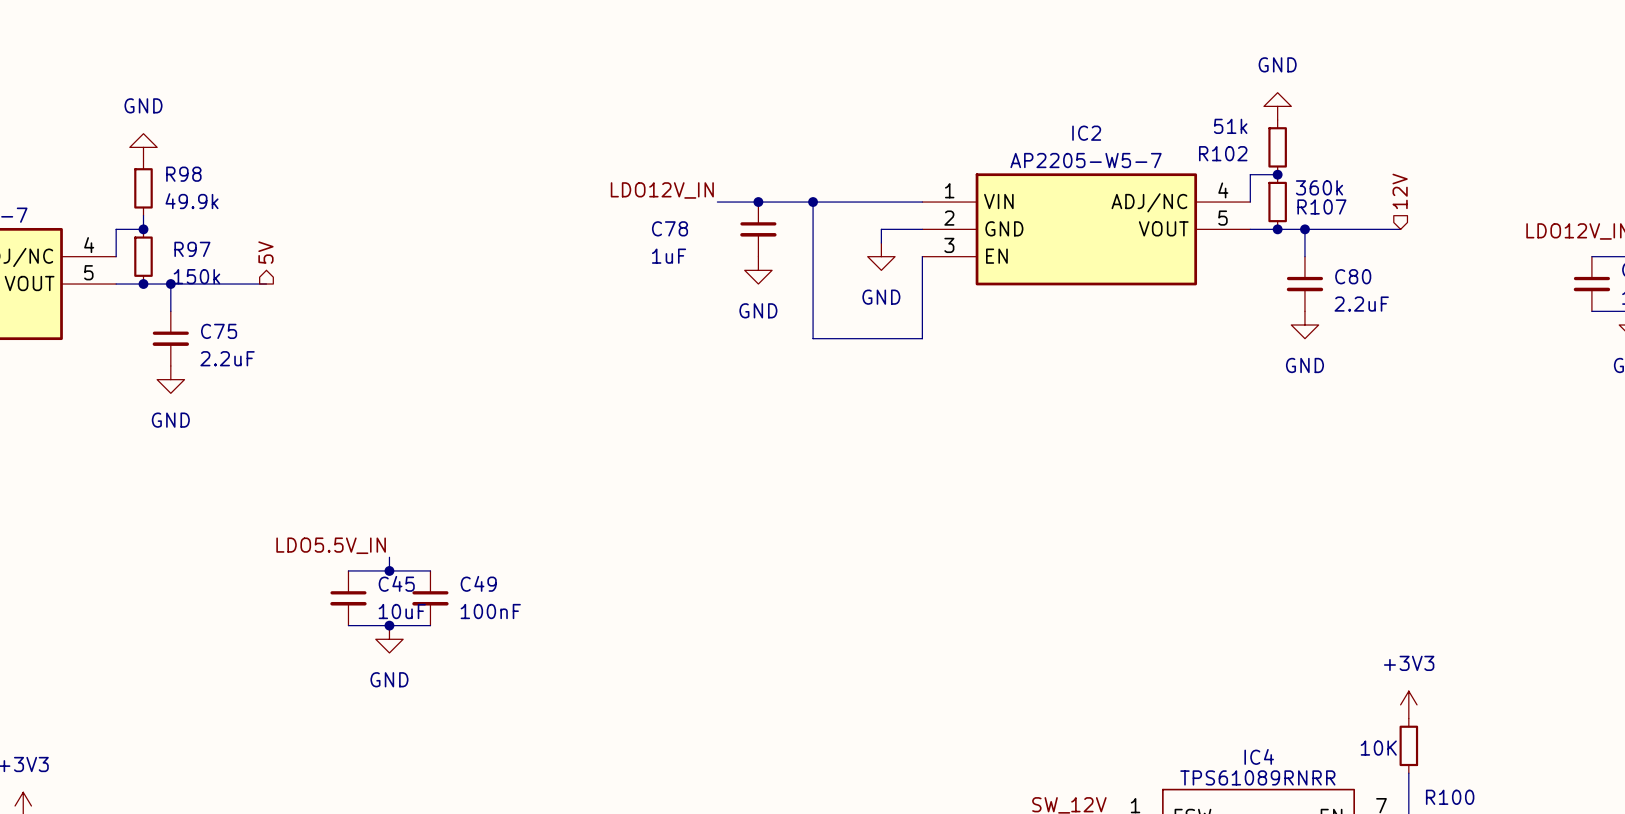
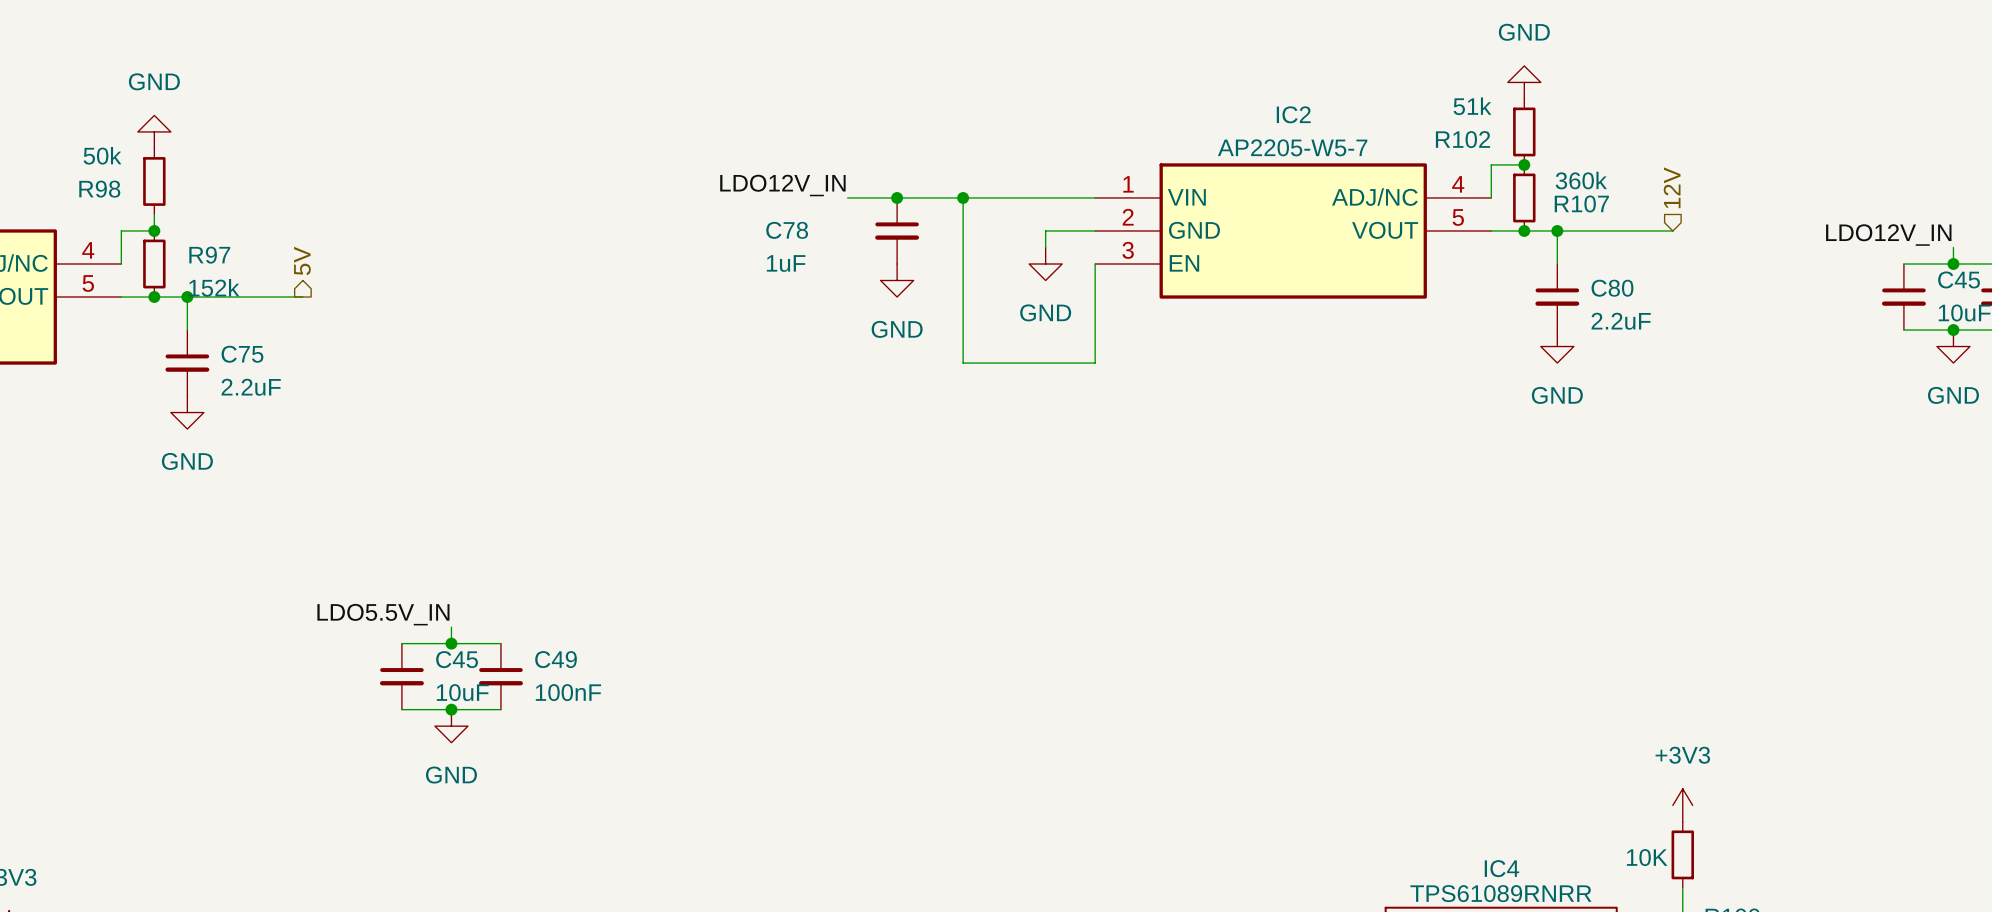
R98 name position: R98 (183, 174) -> R98 (99, 189)
R98 value: 49.9k (192, 201) -> 50k (102, 155)
R97 value: 150k (196, 276) -> 152k (214, 287)

